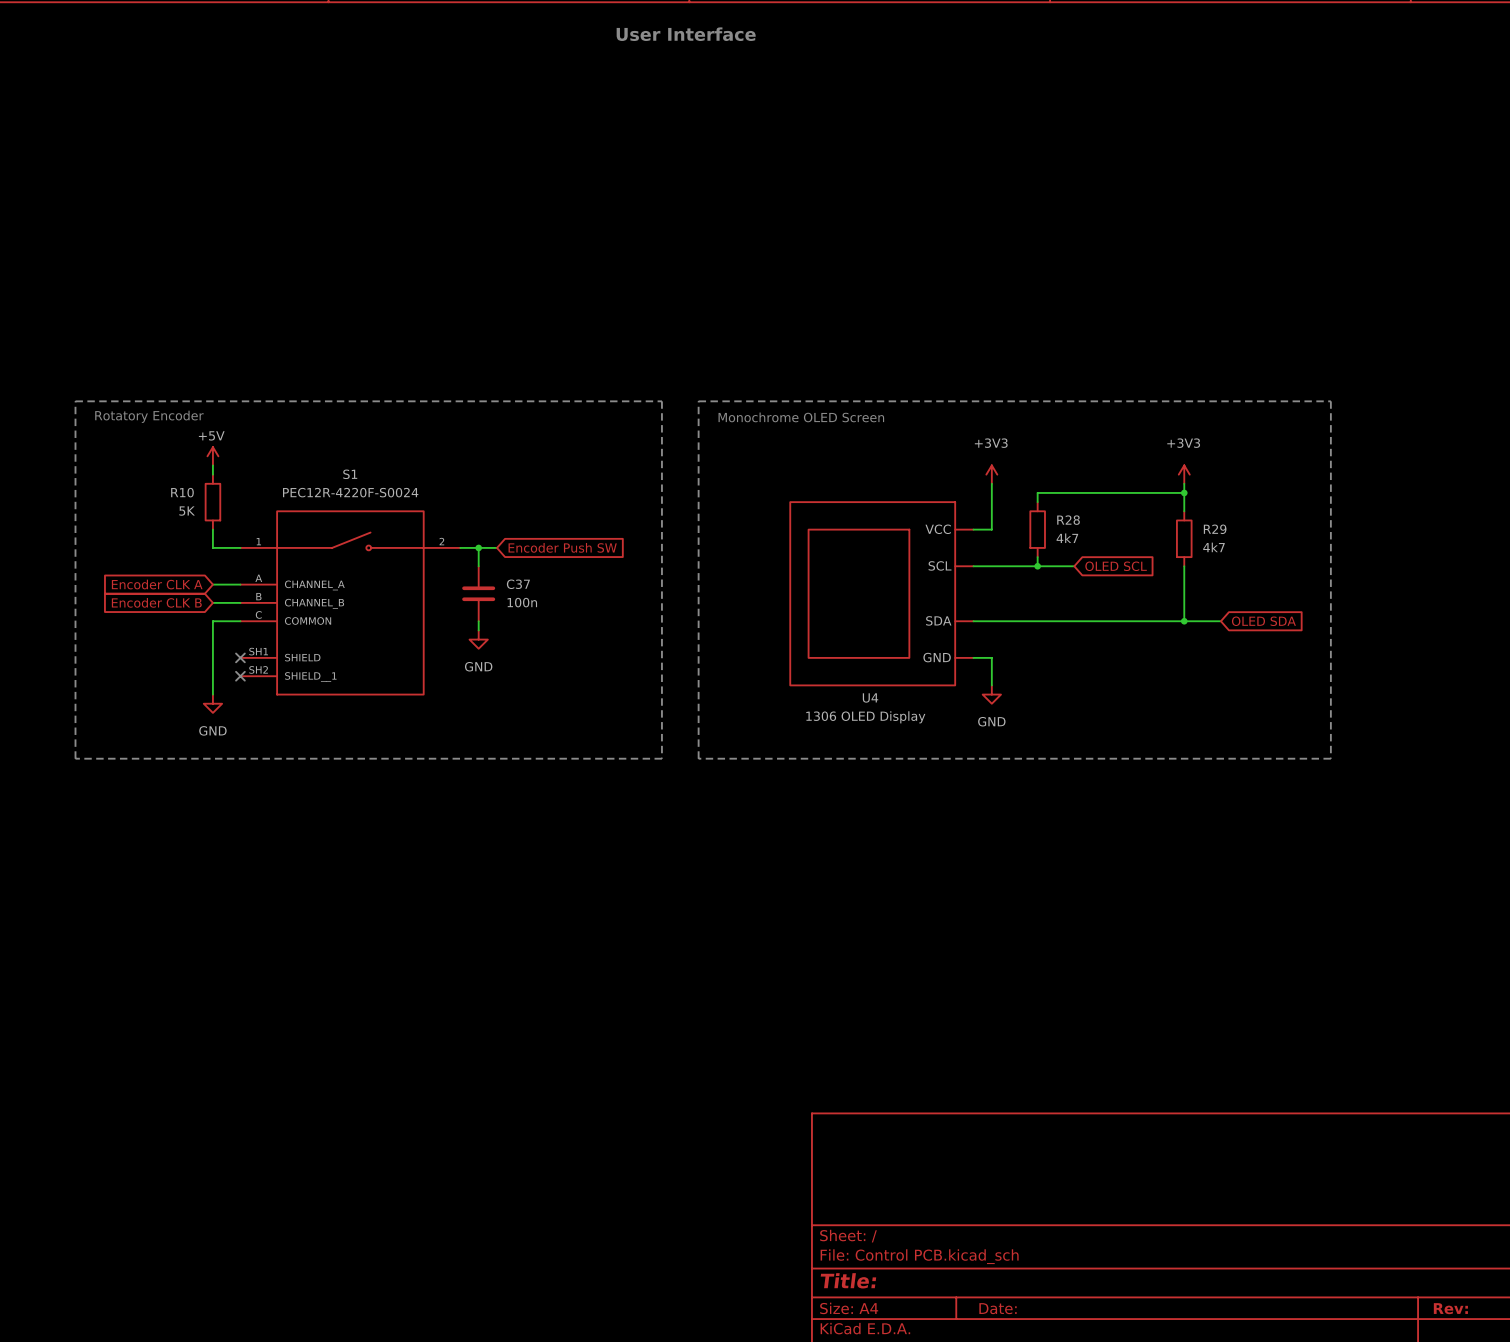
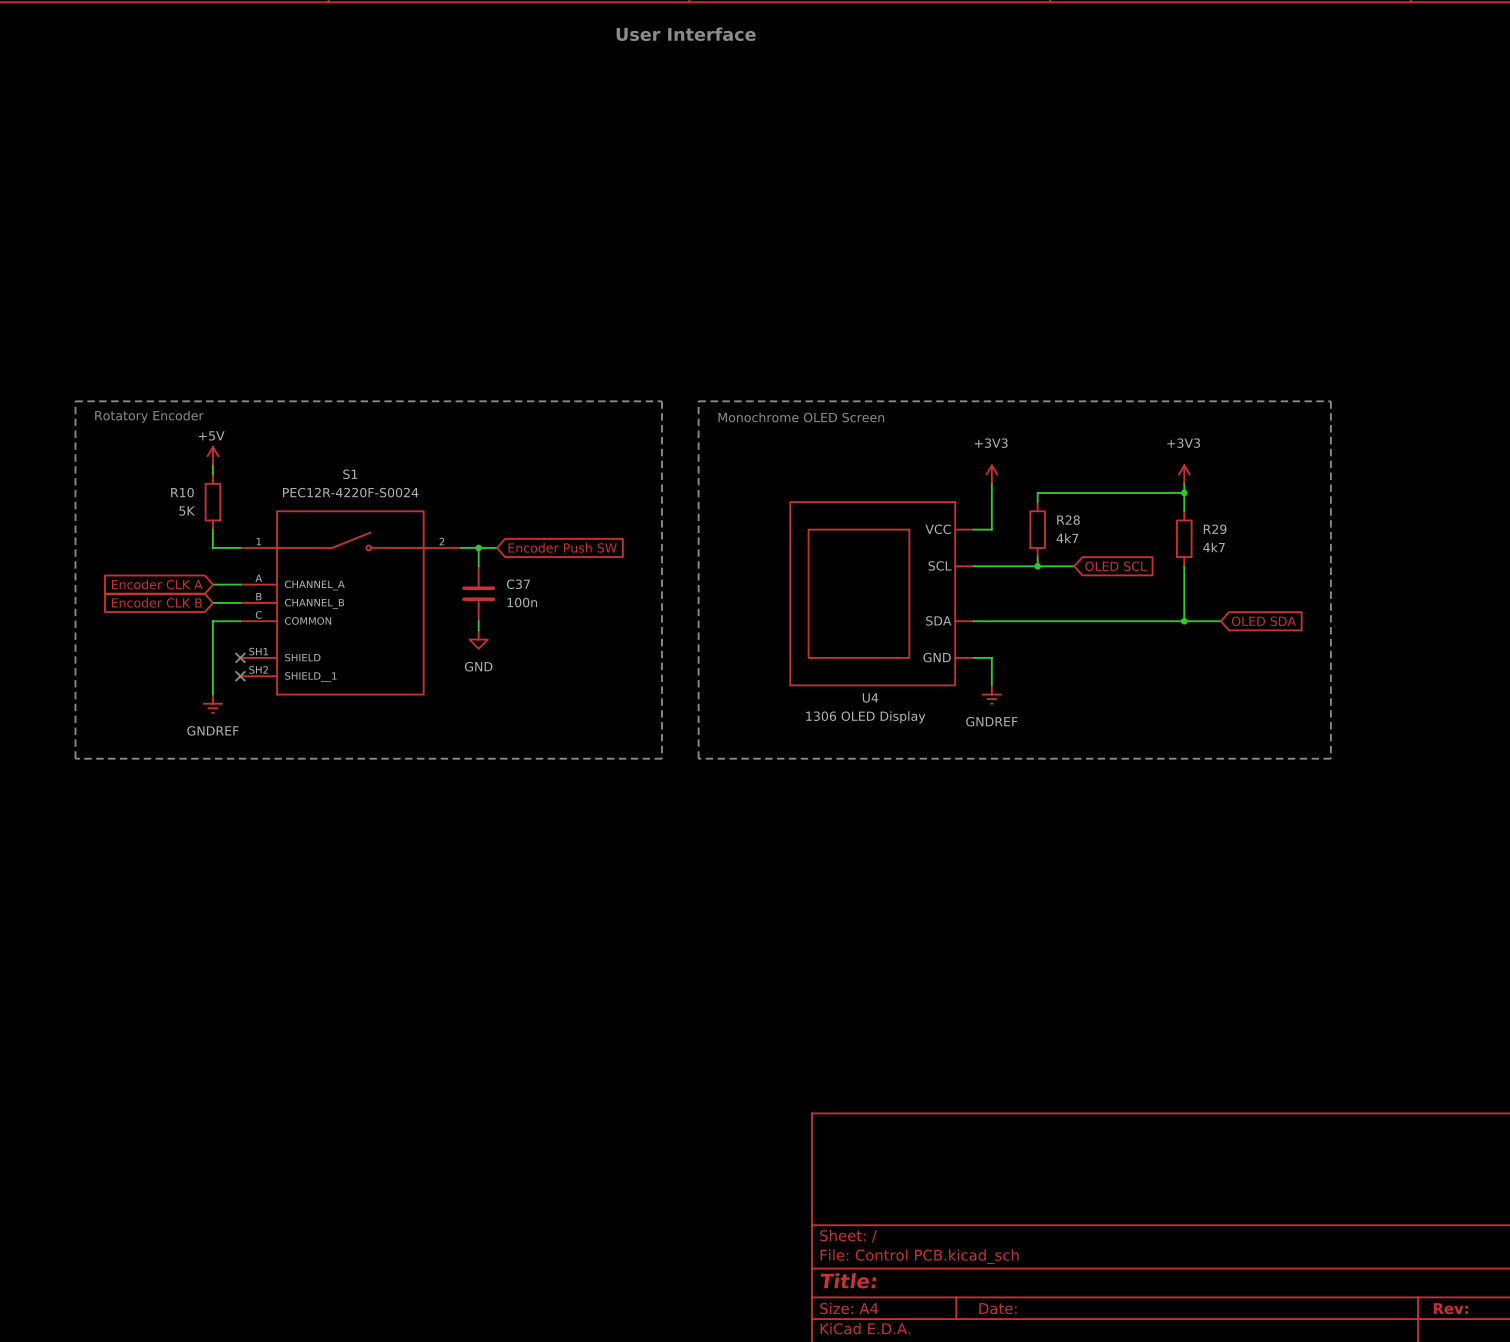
power symbol: GND (991, 694) -> GNDREF (991, 694)
power symbol: GND (212, 703) -> GNDREF (212, 703)

